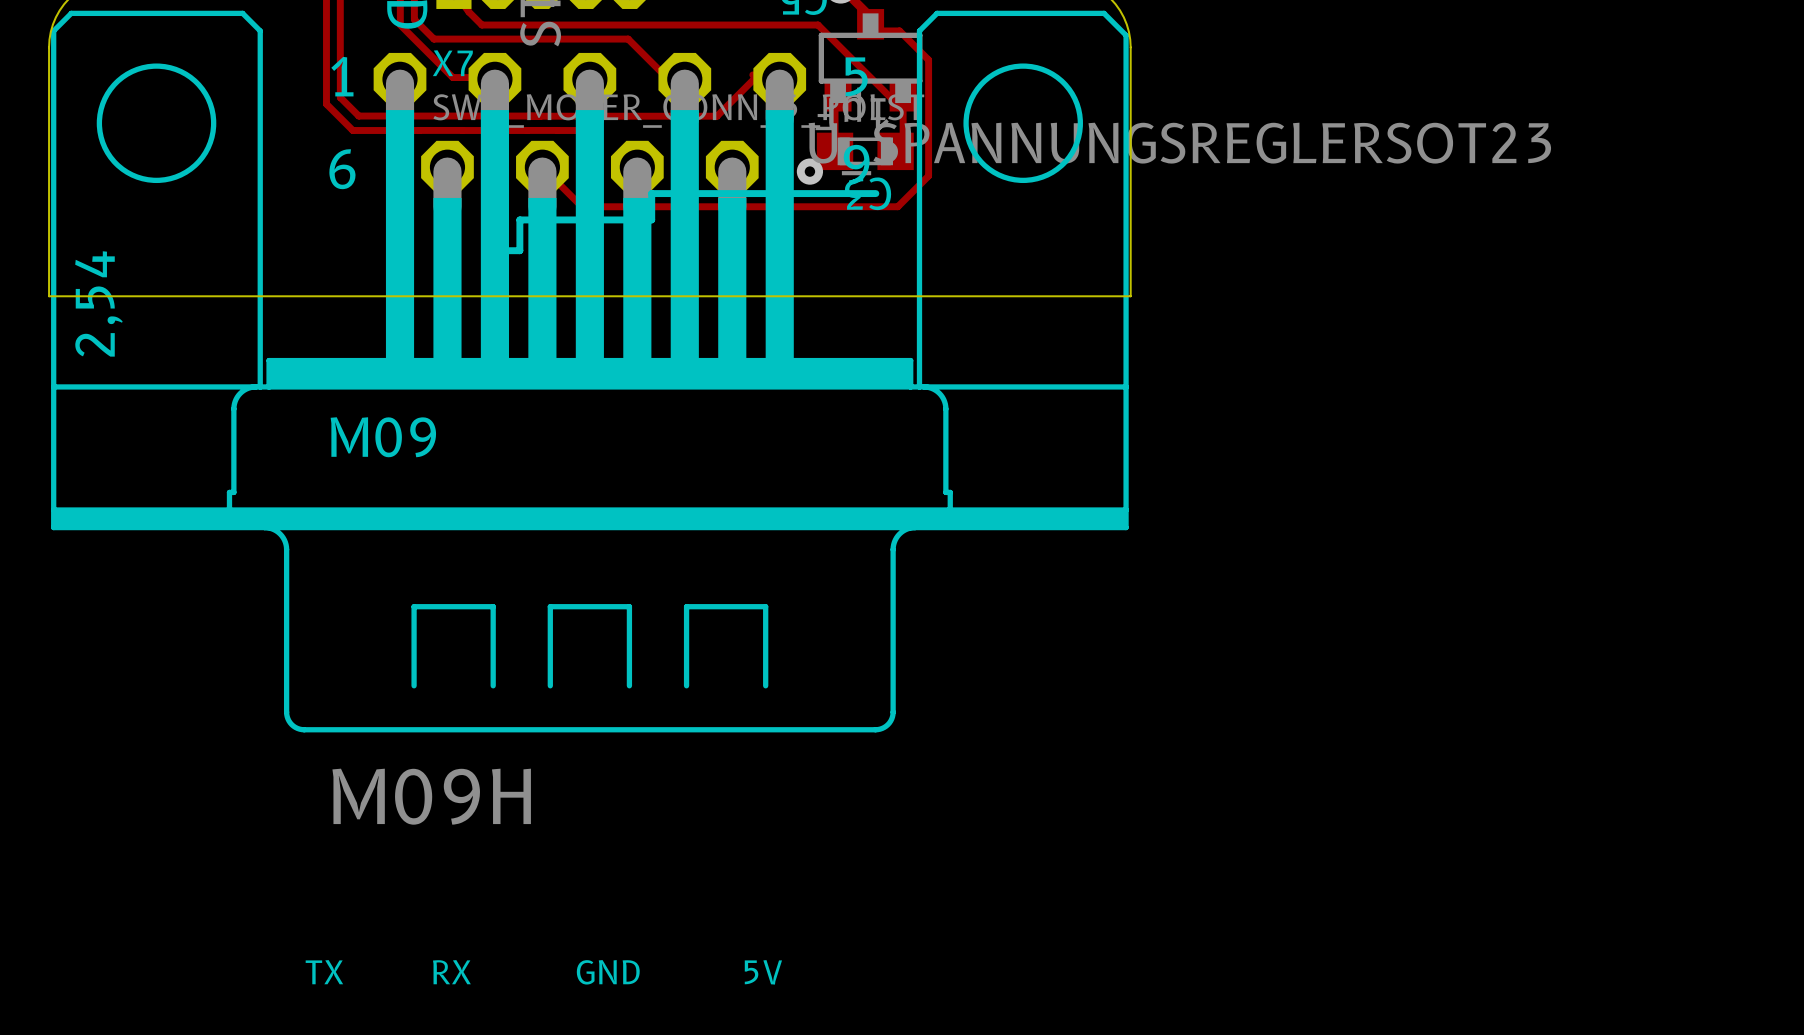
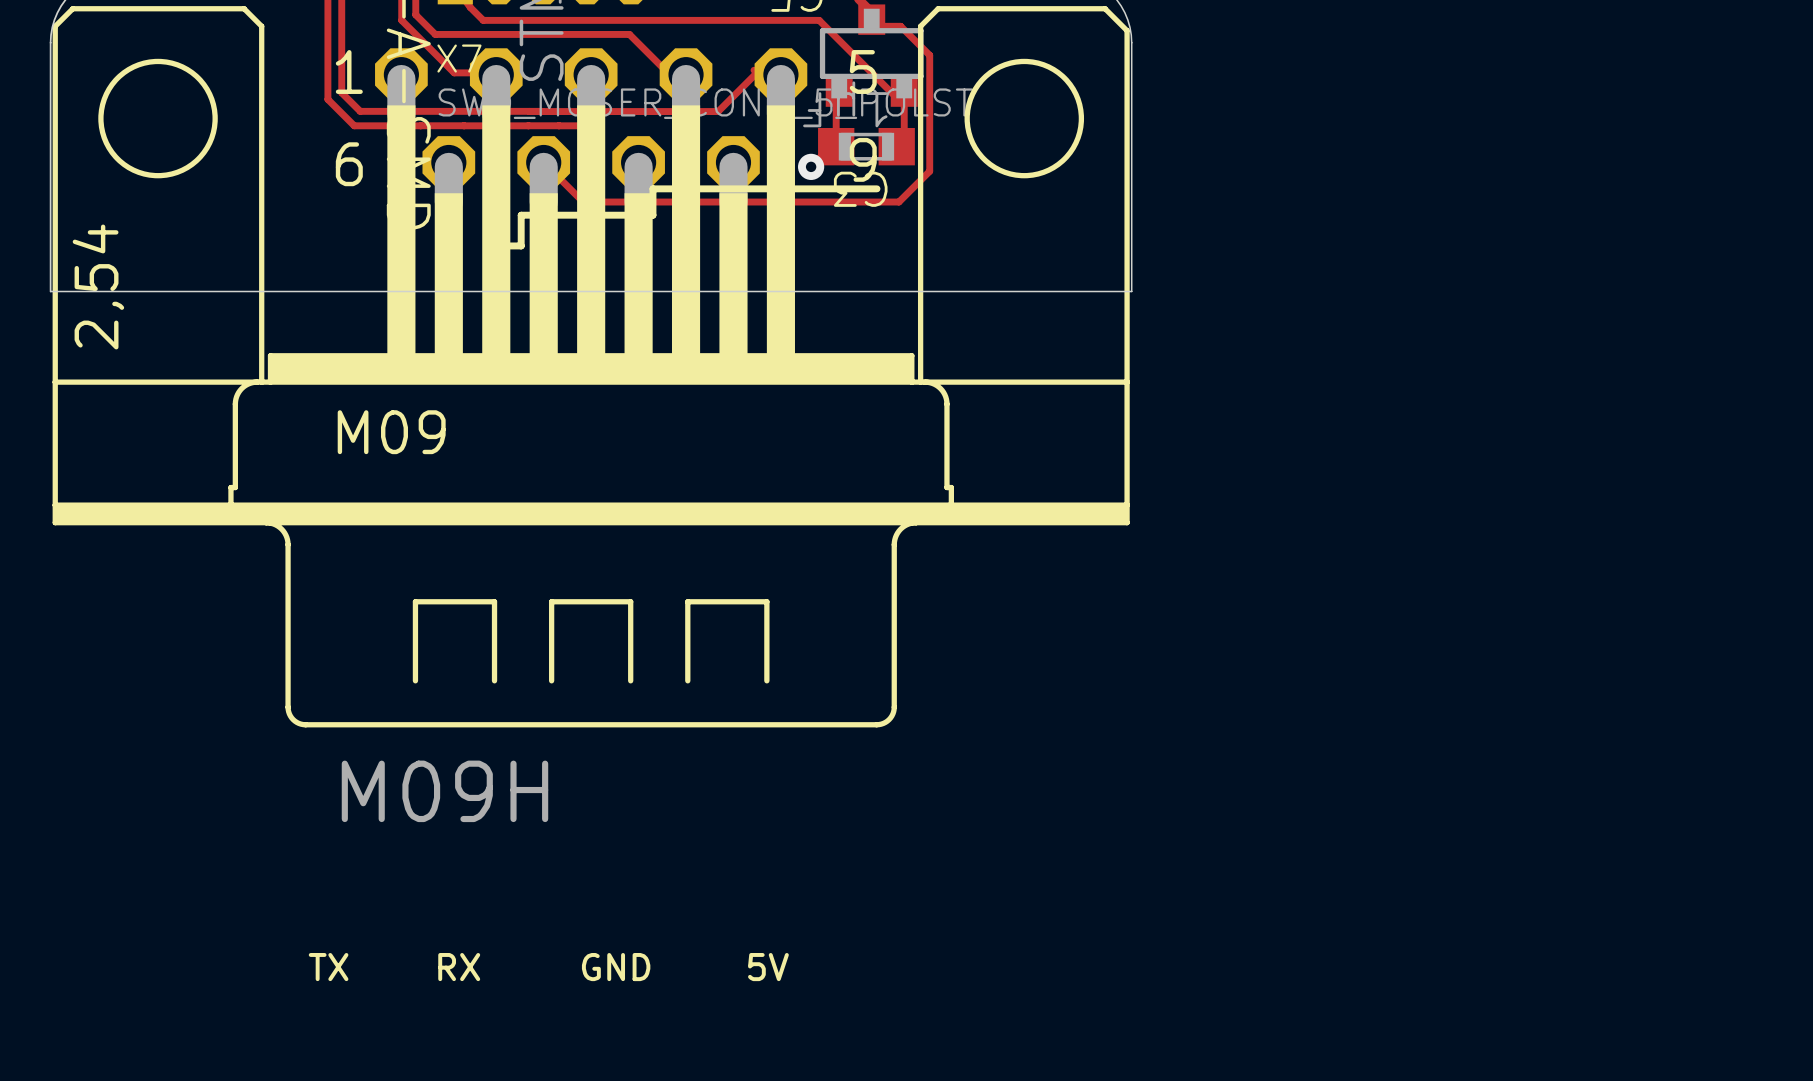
part value: U_SPANNUNGSREGLERSOT23 (1179, 148) -> none

